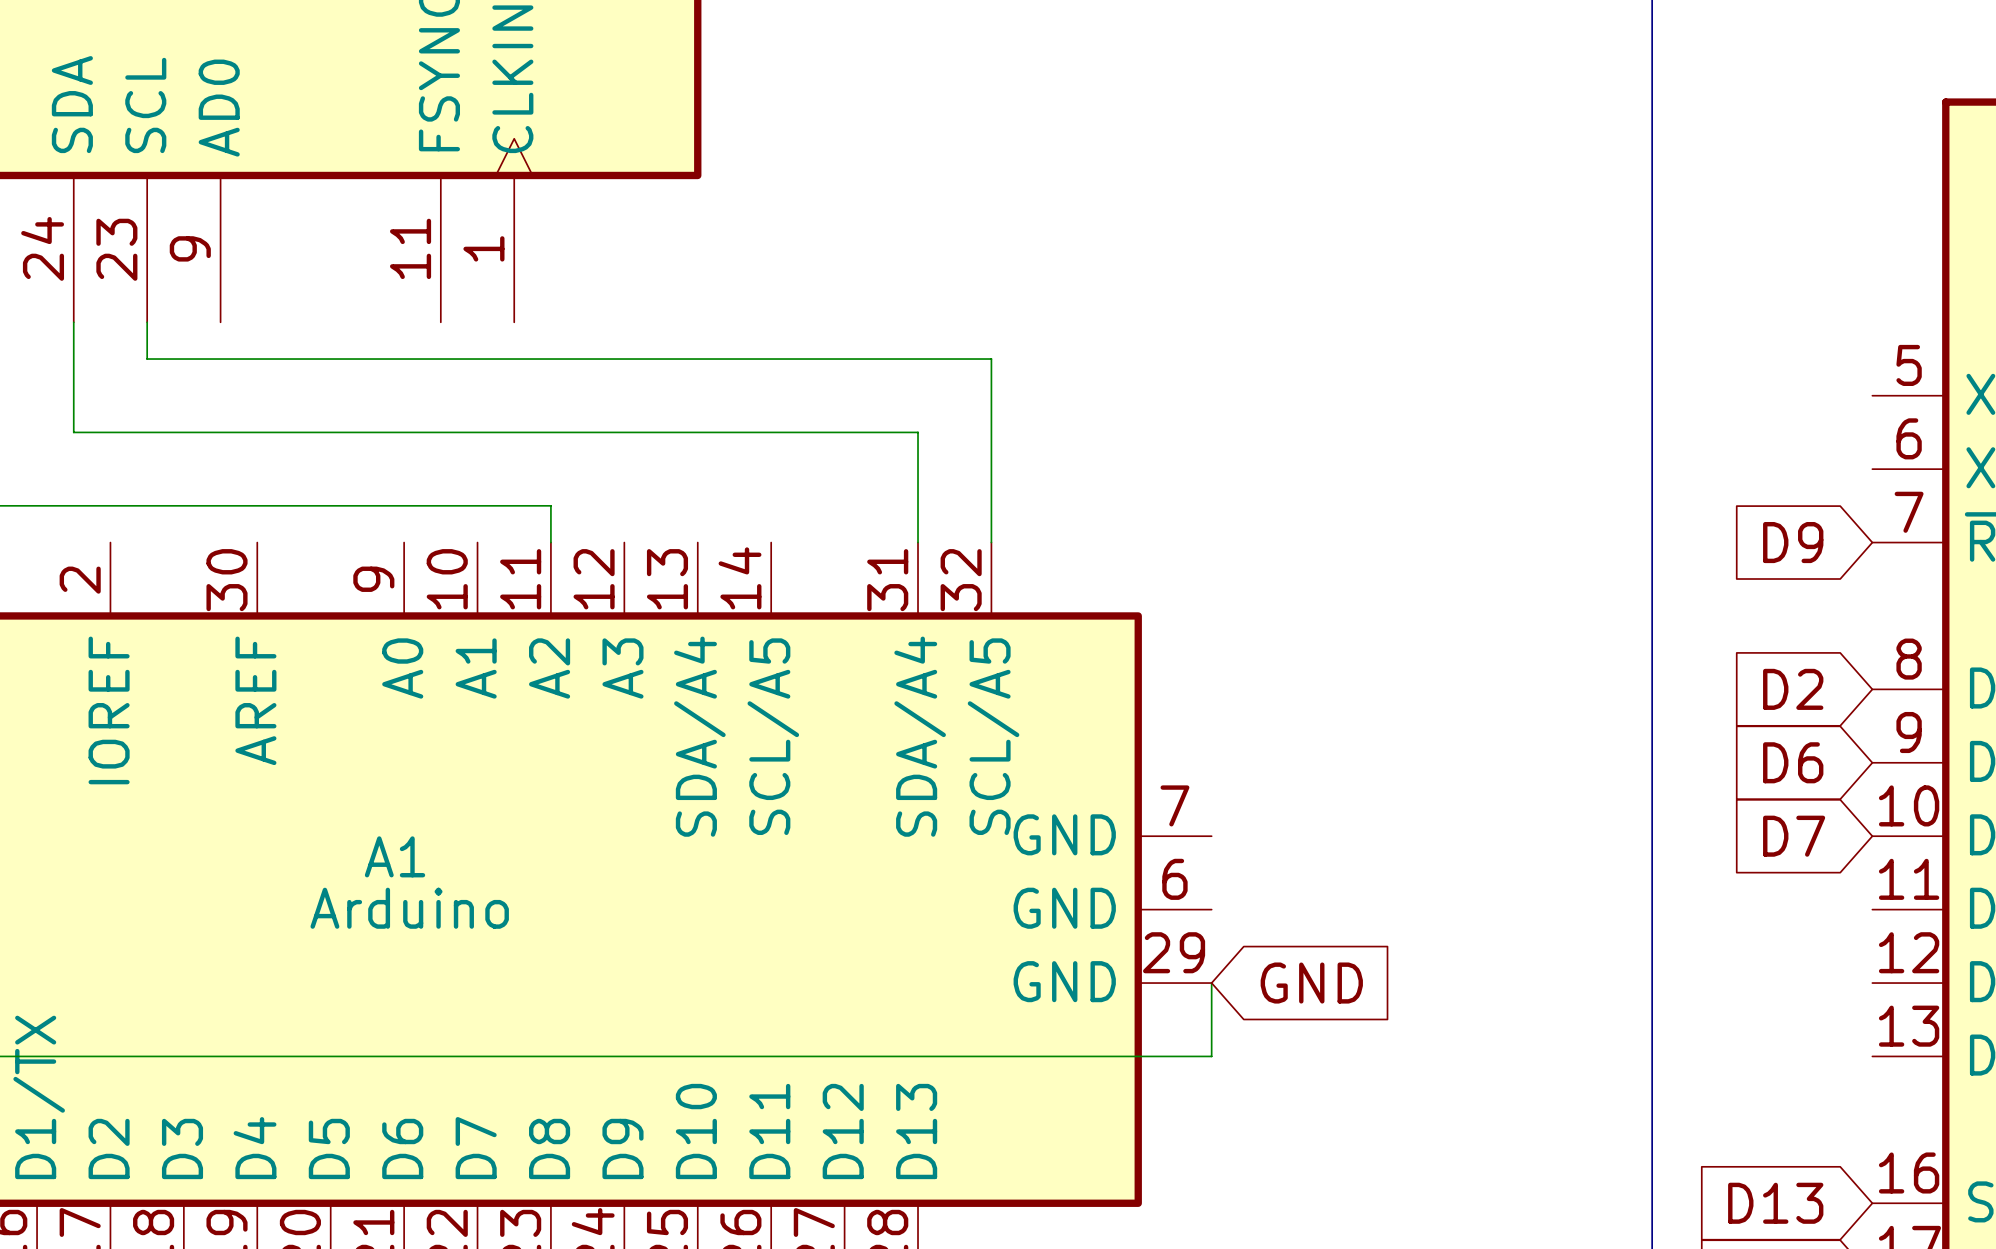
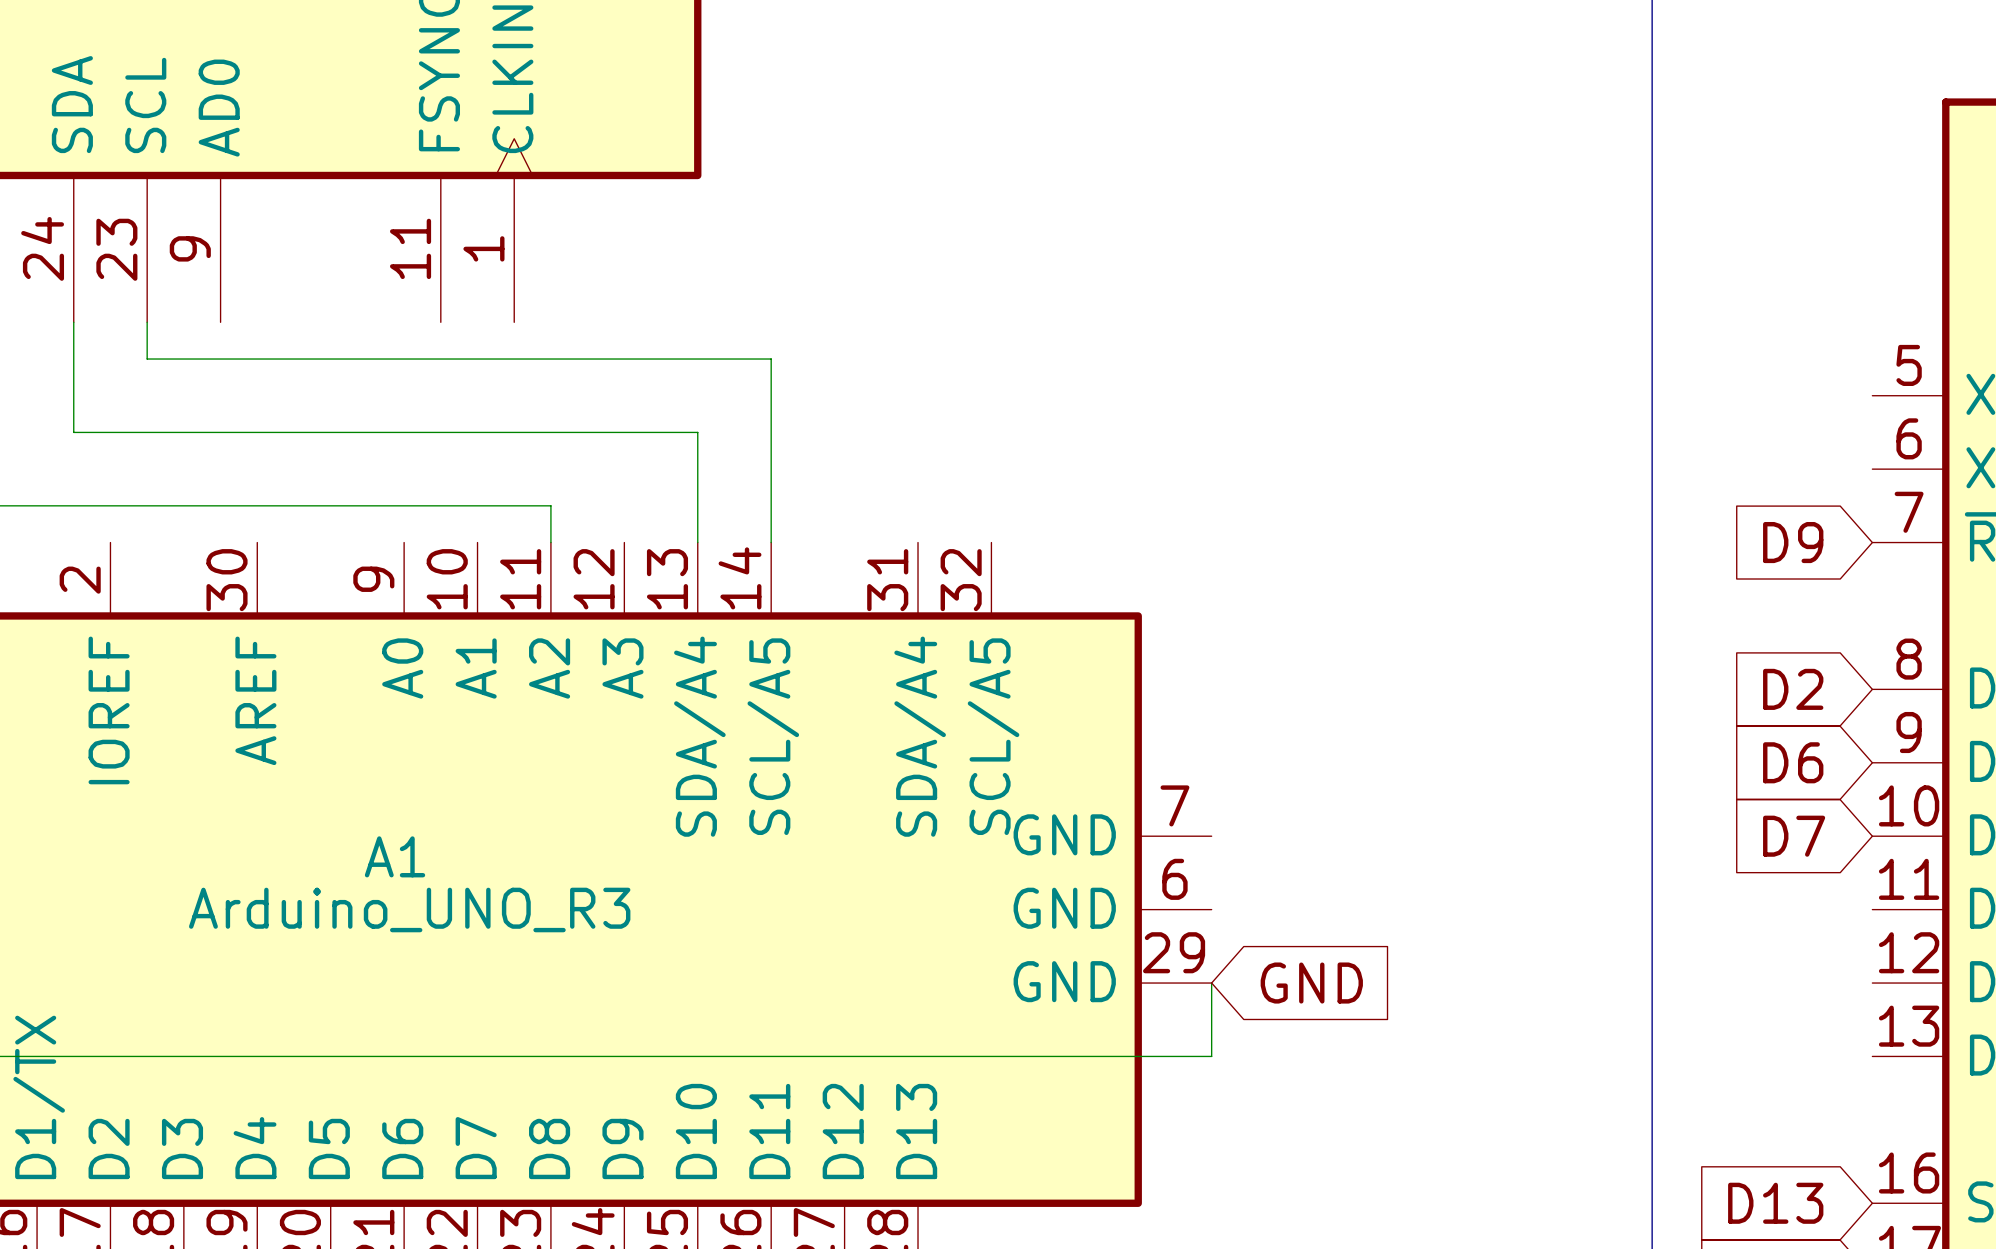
wire: (771, 359) (991, 359) (991, 542) -> (771, 359) (771, 542)
wire: (697, 432) (918, 432) (918, 542) -> (697, 432) (697, 542)
A1 value: Arduino (409, 908) -> Arduino_UNO_R3 (409, 909)

